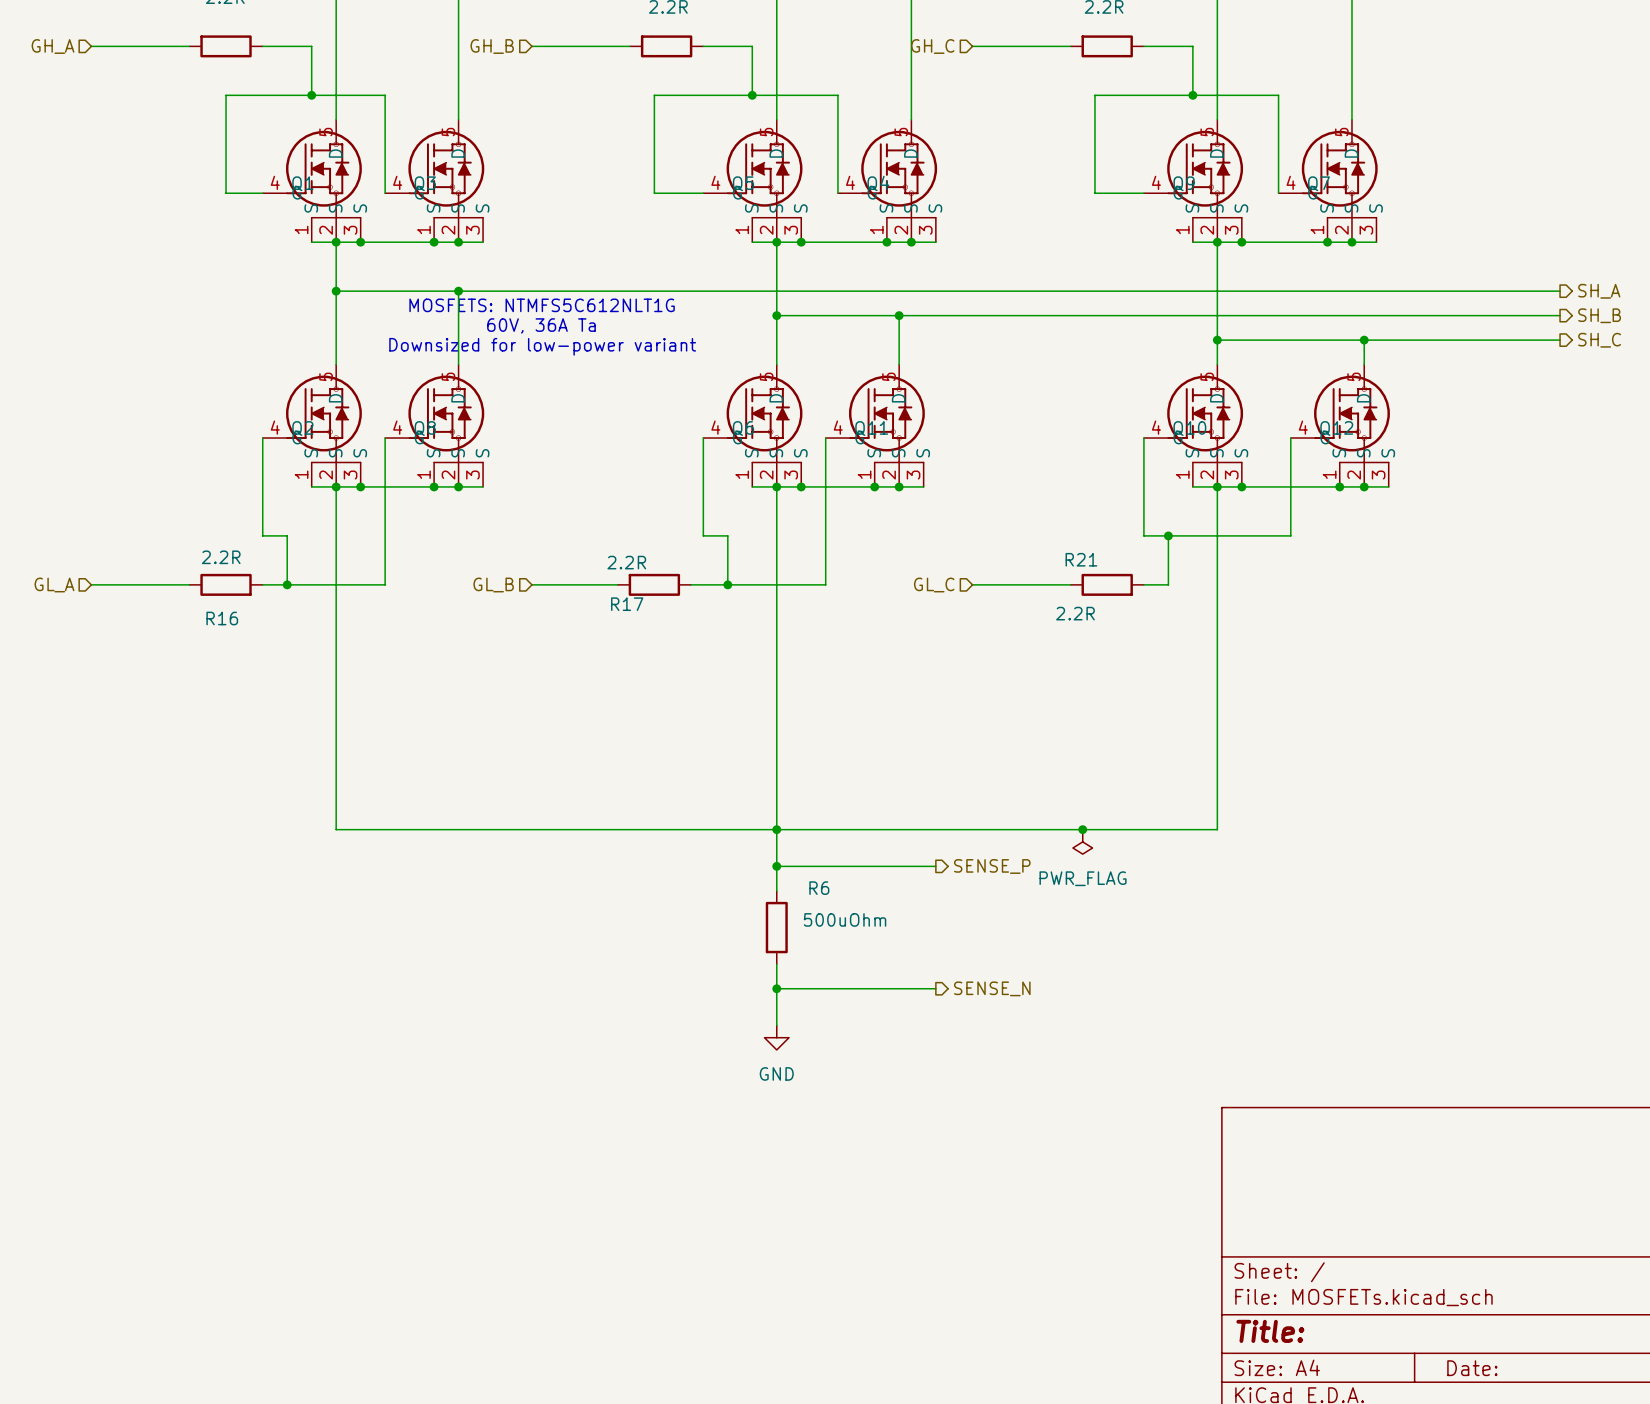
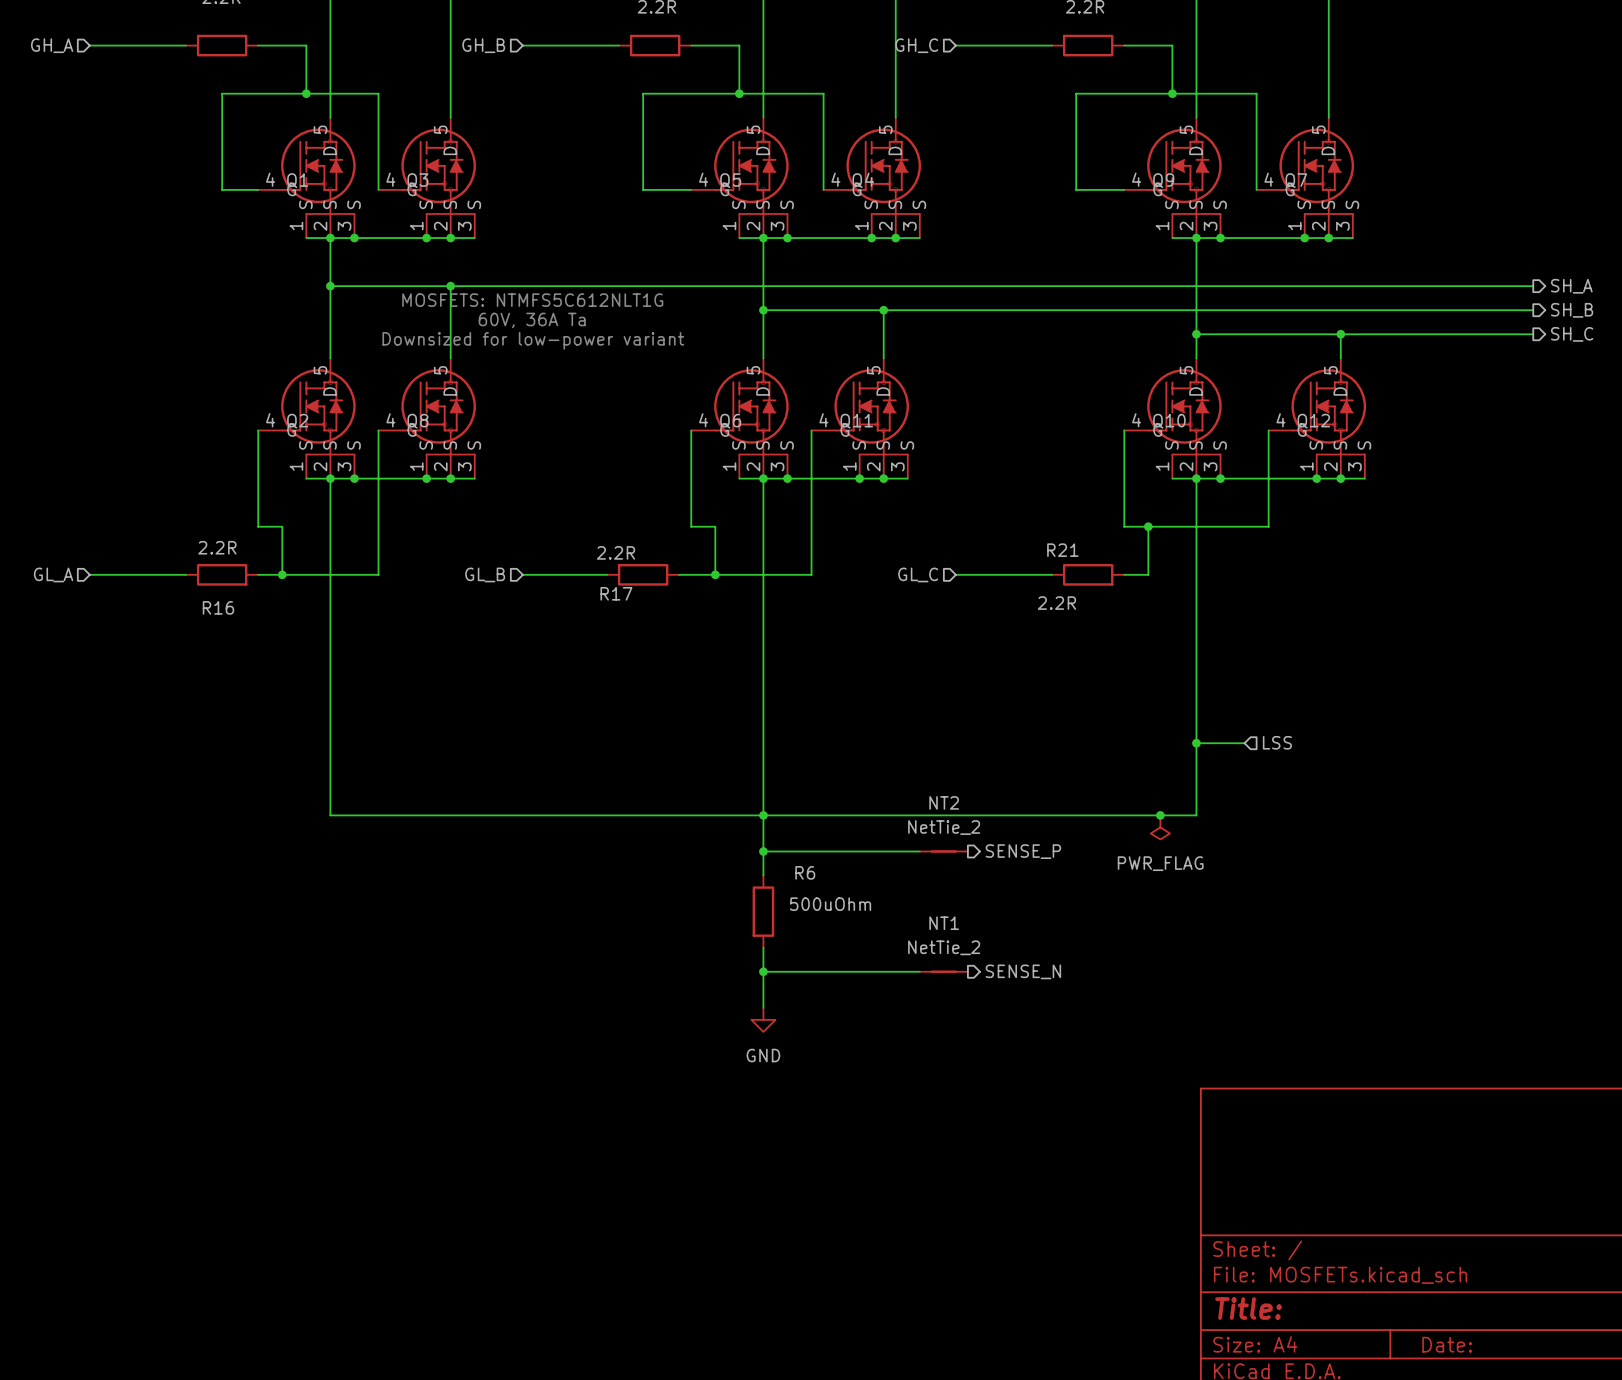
hierarchical label: none -> LSS (1277, 742)
wire: none -> (1196, 743) (1244, 743)
junction: none -> (1196, 743)
junction: (1082, 829) -> none
junction: none -> (1160, 815)
power symbol position: PWR_FLAG (1082, 841) -> PWR_FLAG (1160, 827)
NT2: none -> NetTie_2 (943, 851)
hierarchical label position: SENSE_P (992, 866) -> SENSE_P (1023, 851)
NT1: none -> NetTie_2 (943, 971)
hierarchical label position: SENSE_N (992, 988) -> SENSE_N (1023, 971)

